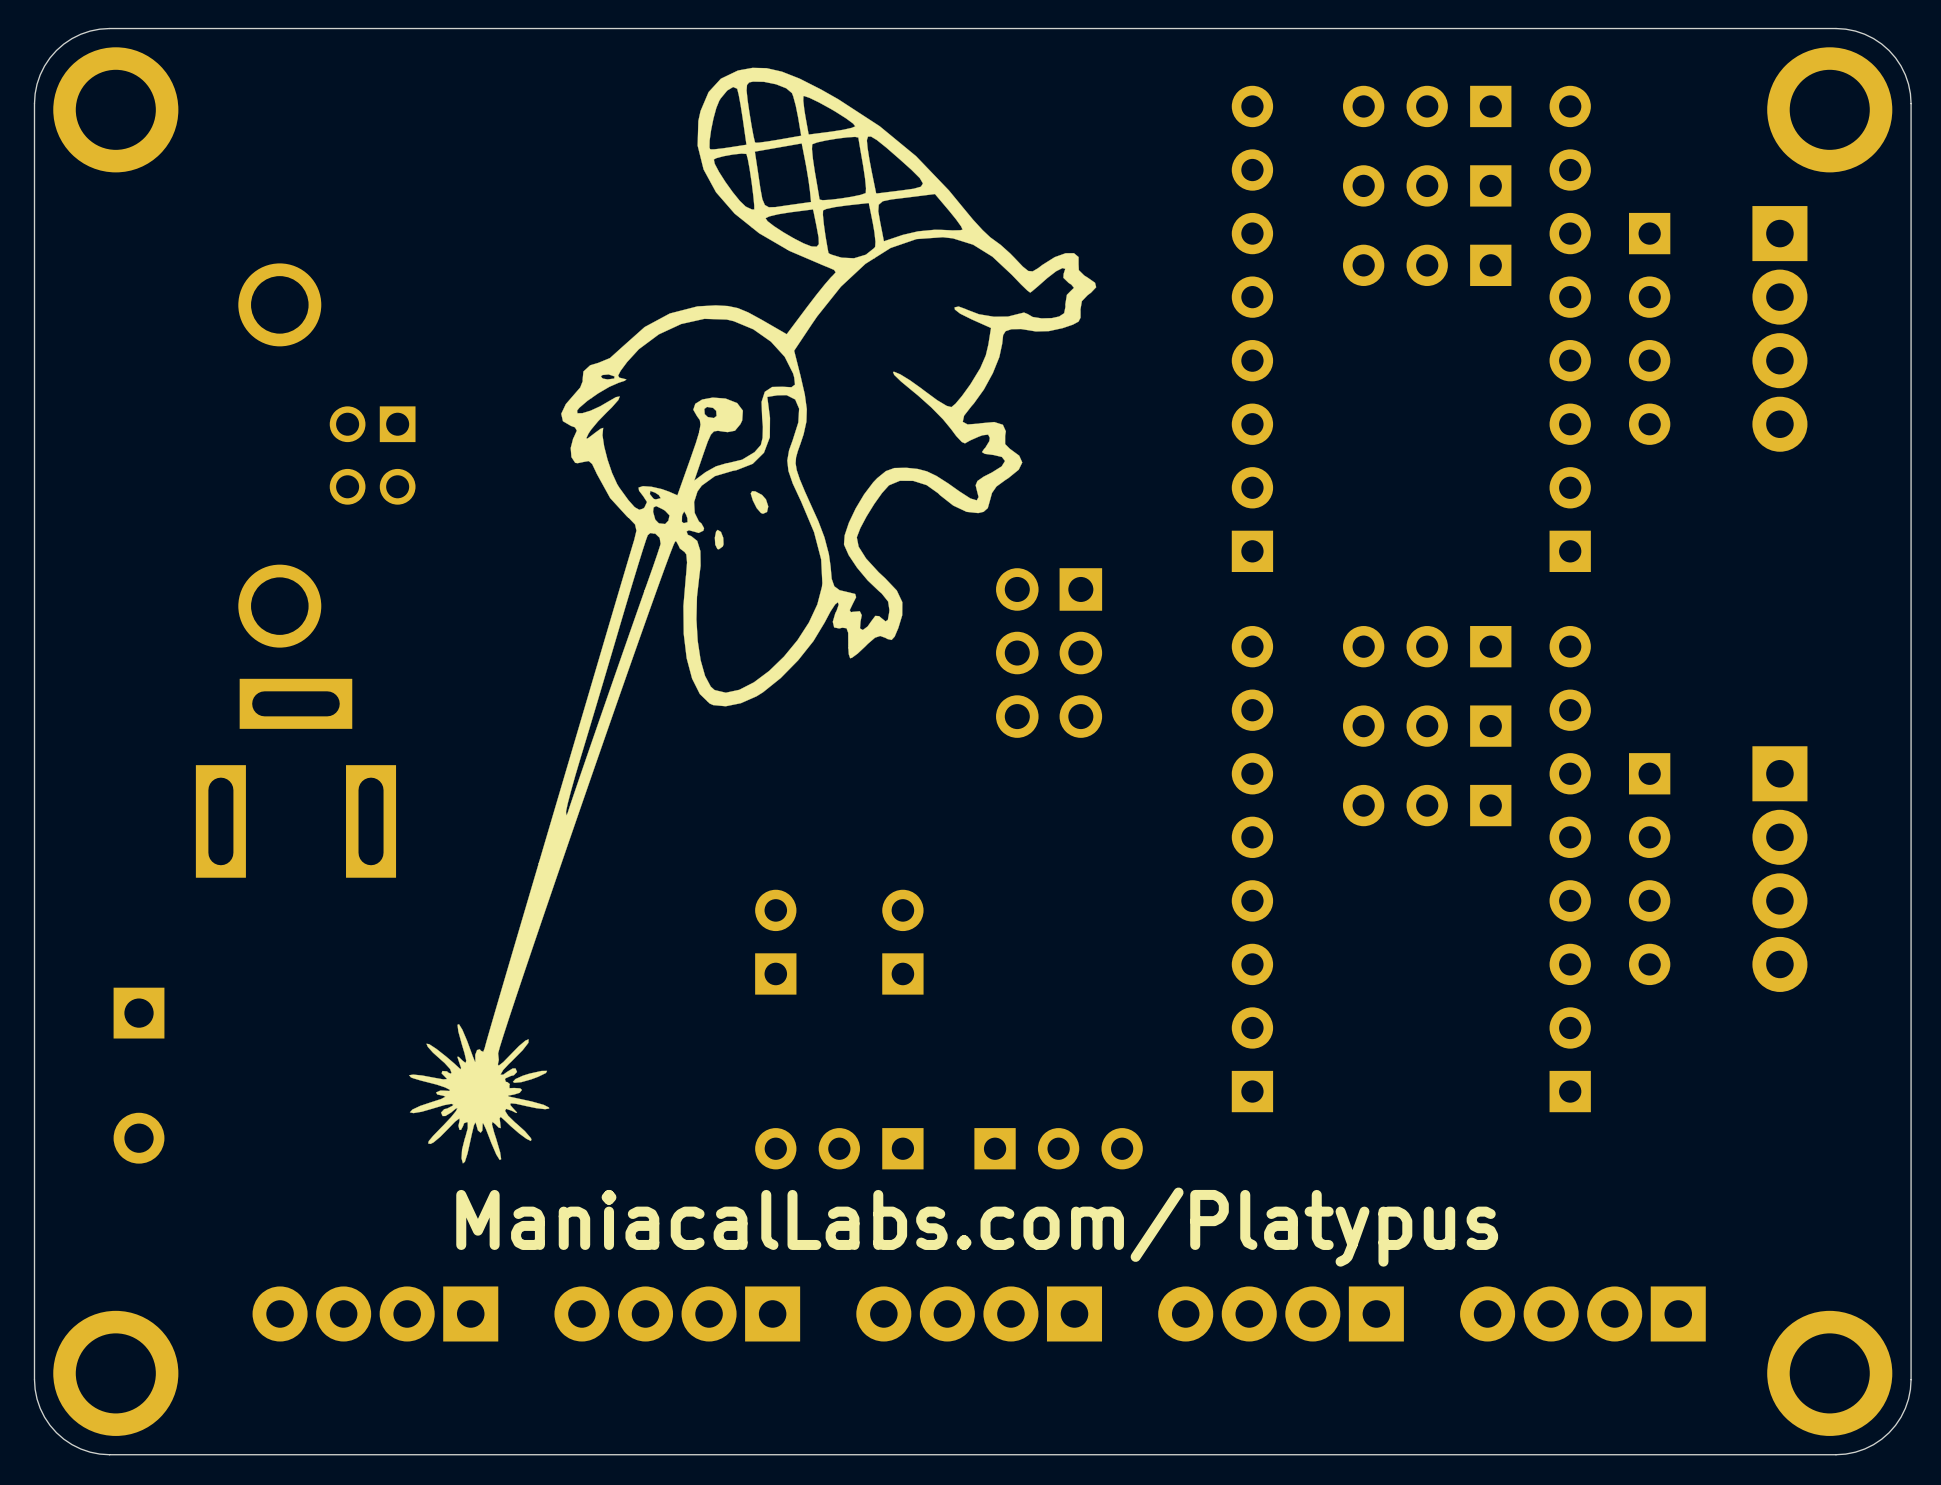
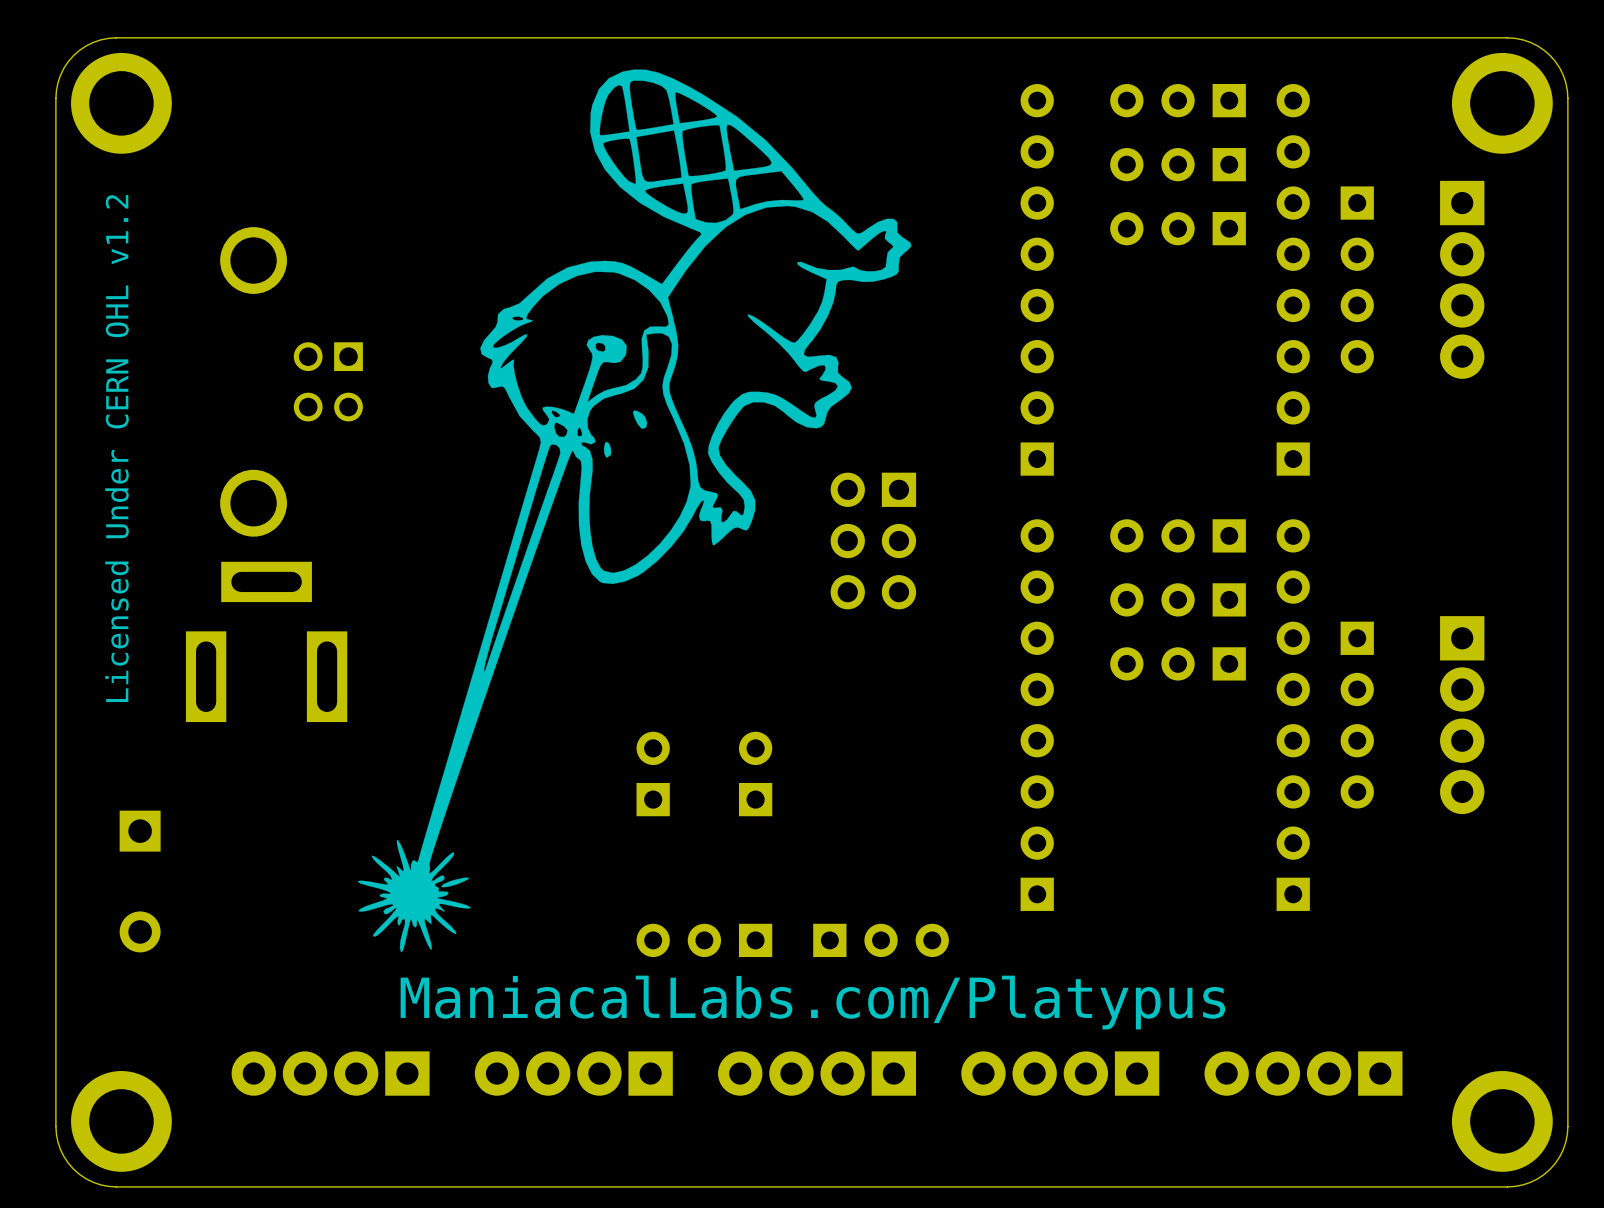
text: none -> Licensed Under CERN OHL v1.2 (117, 448)

